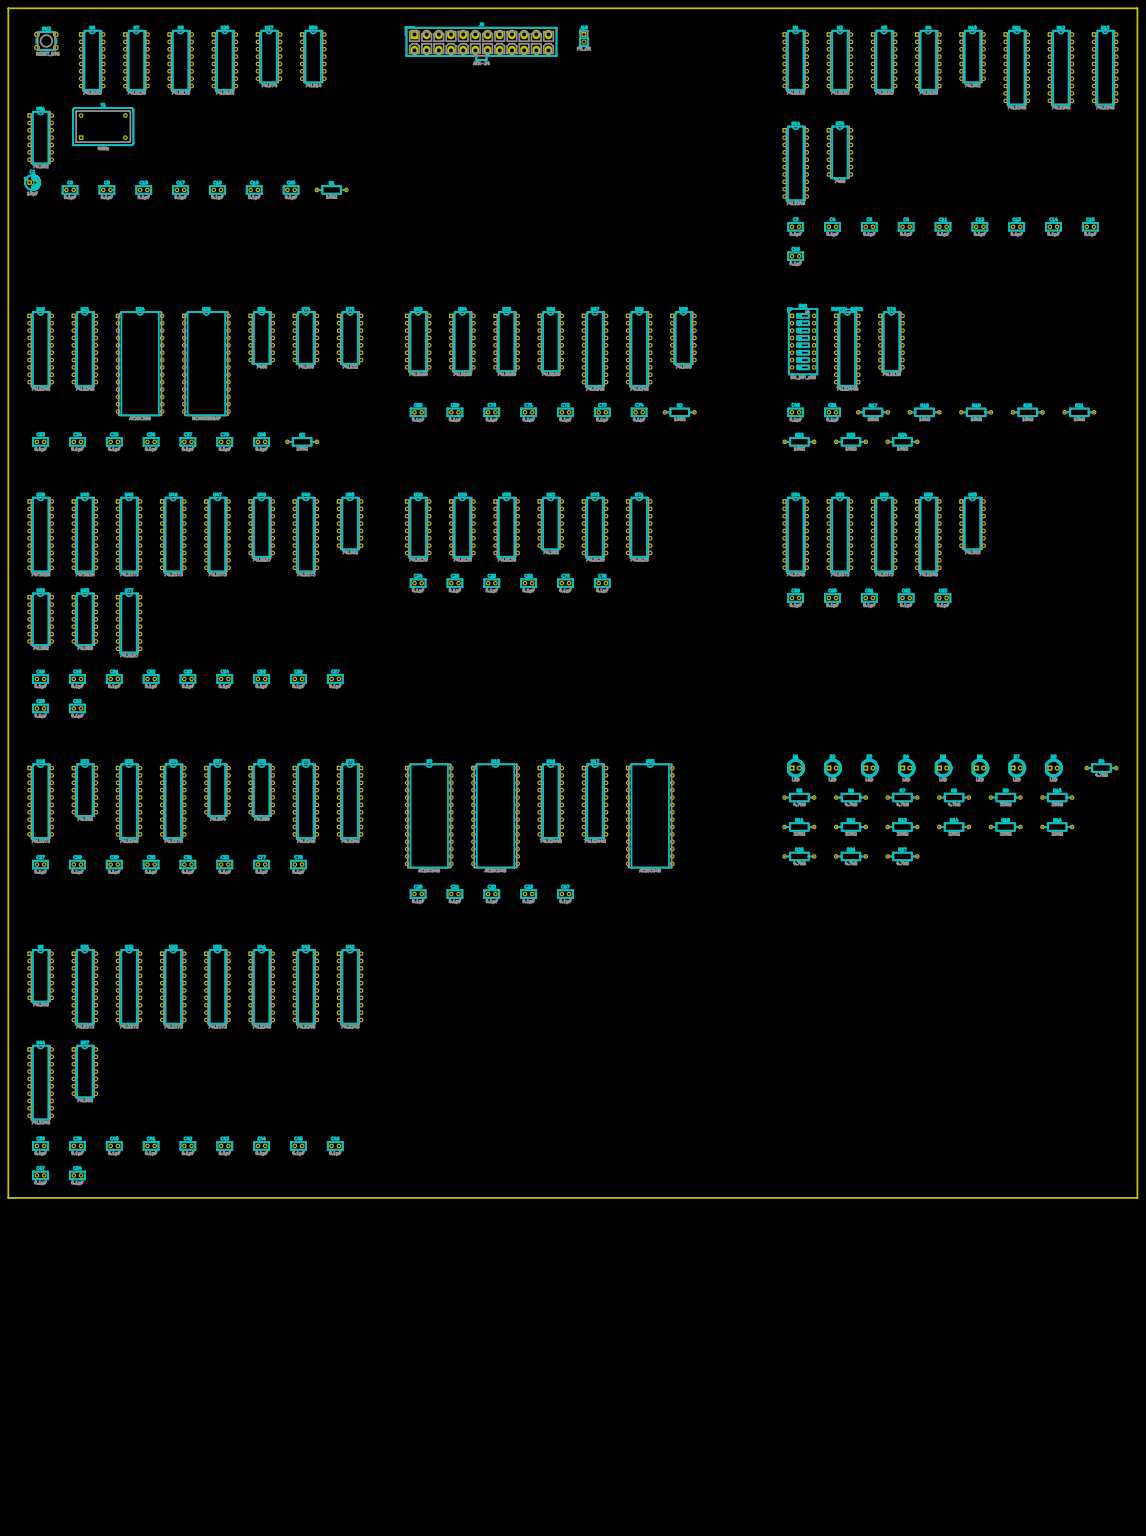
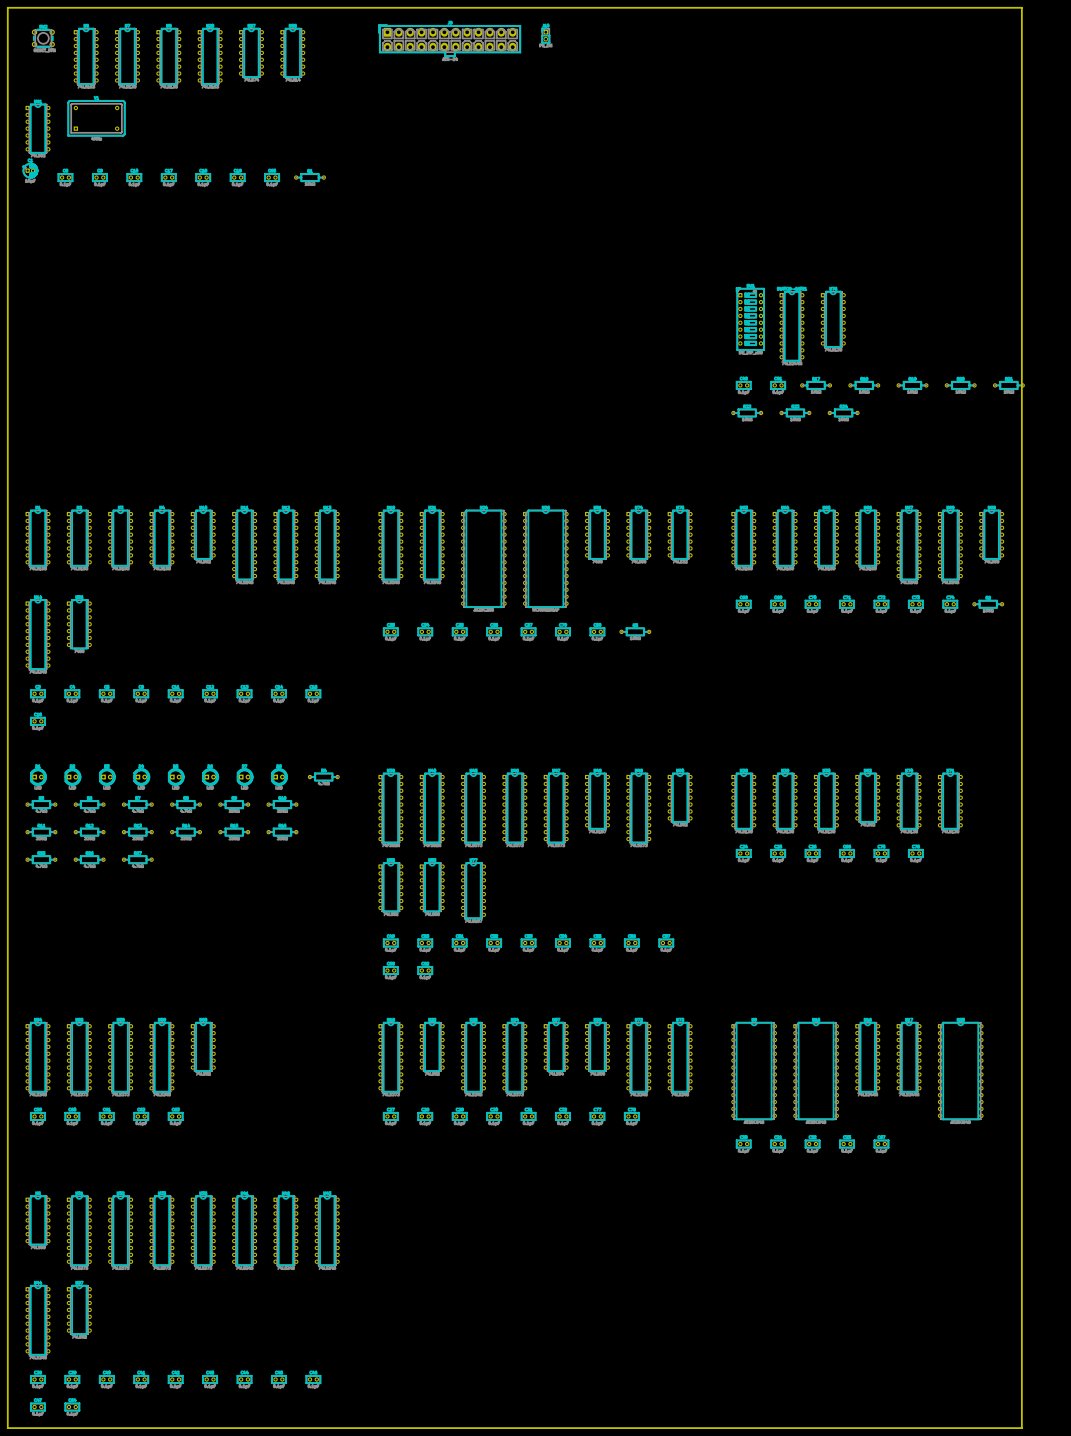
board edge: (1093, 8) (1137, 8) (1137, 1197) (8, 1197) -> (1021, 7) (1021, 1428) (7, 1428) (7, 1119)
part position: (972, 56) -> (203, 534)
part position: (795, 60) -> (37, 538)
part position: (839, 60) -> (79, 538)
part position: (884, 60) -> (120, 538)
part position: (928, 60) -> (161, 538)
part position: (1016, 67) -> (244, 545)
part position: (1060, 67) -> (285, 545)
part position: (1105, 67) -> (327, 545)
part position: (839, 152) -> (79, 624)
part position: (795, 163) -> (37, 634)
part position: (795, 226) -> (37, 693)
part position: (832, 226) -> (72, 693)
part position: (869, 226) -> (106, 693)
part position: (906, 226) -> (141, 693)
part position: (942, 226) -> (175, 693)
part position: (979, 226) -> (210, 693)
part position: (1016, 226) -> (244, 693)
part position: (1053, 226) -> (278, 693)
part position: (1090, 226) -> (313, 693)
part position: (795, 256) -> (37, 721)
part position: (261, 337) -> (597, 534)
part position: (305, 337) -> (638, 534)
part position: (350, 337) -> (680, 534)
part position: (683, 337) -> (991, 534)
part position: (418, 341) -> (743, 538)
part position: (462, 341) -> (785, 538)
part position: (506, 341) -> (826, 538)
part position: (550, 341) -> (867, 538)
part position: (40, 348) -> (390, 545)
part position: (84, 348) -> (432, 545)
part position: (594, 348) -> (909, 545)
part position: (639, 348) -> (950, 545)
part position: (140, 363) -> (483, 558)
part position: (206, 363) -> (545, 558)
part position: (418, 412) -> (743, 604)
part position: (454, 412) -> (778, 604)
part position: (491, 412) -> (812, 604)
part position: (528, 412) -> (847, 604)
part position: (565, 412) -> (881, 604)
part position: (602, 412) -> (915, 604)
part position: (639, 412) -> (950, 604)
part position: (679, 412) -> (988, 604)
part position: (40, 441) -> (390, 631)
part position: (77, 441) -> (425, 631)
part position: (114, 441) -> (459, 631)
part position: (151, 441) -> (494, 631)
part position: (187, 441) -> (528, 631)
part position: (224, 441) -> (562, 631)
part position: (261, 441) -> (597, 631)
part position: (302, 441) -> (635, 631)
part position: (350, 523) -> (680, 797)
part position: (550, 523) -> (867, 797)
part position: (972, 523) -> (203, 1046)
part position: (261, 527) -> (597, 801)
part position: (418, 527) -> (743, 801)
part position: (462, 527) -> (785, 801)
part position: (506, 527) -> (826, 801)
part position: (594, 527) -> (909, 801)
part position: (639, 527) -> (950, 801)
part position: (40, 534) -> (390, 808)
part position: (84, 534) -> (432, 808)
part position: (129, 534) -> (473, 808)
part position: (173, 534) -> (514, 808)
part position: (217, 534) -> (556, 808)
part position: (305, 534) -> (638, 808)
part position: (795, 534) -> (37, 1057)
part position: (839, 534) -> (79, 1057)
part position: (884, 534) -> (120, 1057)
part position: (928, 534) -> (161, 1057)
part position: (418, 583) -> (743, 853)
part position: (454, 583) -> (778, 853)
part position: (491, 583) -> (812, 853)
part position: (528, 583) -> (847, 853)
part position: (565, 583) -> (881, 853)
part position: (602, 583) -> (915, 853)
part position: (795, 597) -> (37, 1116)
part position: (832, 597) -> (72, 1116)
part position: (869, 597) -> (106, 1116)
part position: (906, 597) -> (141, 1116)
part position: (942, 597) -> (175, 1116)
part position: (40, 619) -> (390, 887)
part position: (84, 619) -> (432, 887)
part position: (129, 623) -> (473, 890)
part position: (40, 678) -> (390, 943)
part position: (77, 678) -> (425, 943)
part position: (114, 678) -> (459, 943)
part position: (151, 678) -> (494, 943)
part position: (187, 678) -> (528, 943)
part position: (224, 678) -> (562, 943)
part position: (261, 678) -> (597, 943)
part position: (298, 678) -> (631, 943)
part position: (335, 678) -> (666, 943)
part position: (40, 708) -> (390, 970)
part position: (77, 708) -> (425, 970)
part position: (796, 768) -> (38, 777)
part position: (833, 768) -> (73, 777)
part position: (869, 768) -> (107, 777)
part position: (906, 768) -> (141, 777)
part position: (943, 768) -> (176, 777)
part position: (980, 768) -> (210, 777)
part position: (1017, 768) -> (245, 777)
part position: (1054, 768) -> (279, 777)
part position: (1101, 768) -> (323, 777)
part position: (84, 790) -> (432, 1046)
part position: (217, 790) -> (556, 1046)
part position: (261, 790) -> (597, 1046)
part position: (799, 797) -> (41, 804)
part position: (850, 797) -> (89, 804)
part position: (902, 797) -> (137, 804)
part position: (954, 797) -> (186, 804)
part position: (1005, 797) -> (234, 804)
part position: (1057, 797) -> (282, 804)
part position: (40, 801) -> (390, 1057)
part position: (129, 801) -> (473, 1057)
part position: (173, 801) -> (514, 1057)
part position: (305, 801) -> (638, 1057)
part position: (350, 801) -> (680, 1057)
part position: (550, 801) -> (867, 1057)
part position: (594, 801) -> (909, 1057)
part position: (429, 815) -> (754, 1071)
part position: (495, 815) -> (816, 1071)
part position: (650, 815) -> (960, 1071)
part position: (799, 826) -> (41, 832)
part position: (850, 826) -> (89, 832)
part position: (902, 826) -> (137, 832)
part position: (954, 826) -> (186, 832)
part position: (1005, 826) -> (234, 832)
part position: (1057, 826) -> (282, 832)
part position: (799, 856) -> (41, 859)
part position: (850, 856) -> (89, 859)
part position: (902, 856) -> (137, 859)
part position: (40, 864) -> (390, 1116)
part position: (77, 864) -> (425, 1116)
part position: (114, 864) -> (459, 1116)
part position: (151, 864) -> (494, 1116)
part position: (187, 864) -> (528, 1116)
part position: (224, 864) -> (562, 1116)
part position: (261, 864) -> (597, 1116)
part position: (298, 864) -> (631, 1116)
part position: (418, 894) -> (743, 1144)
part position: (454, 894) -> (778, 1144)
part position: (491, 894) -> (812, 1144)
part position: (528, 894) -> (847, 1144)
part position: (565, 894) -> (881, 1144)
part position: (40, 975) -> (37, 1220)
part position: (84, 986) -> (79, 1230)
part position: (129, 986) -> (120, 1230)
part position: (173, 986) -> (161, 1230)
part position: (217, 986) -> (203, 1230)
part position: (261, 986) -> (244, 1230)
part position: (305, 986) -> (285, 1230)
part position: (350, 986) -> (327, 1230)
part position: (84, 1071) -> (79, 1309)
part position: (40, 1082) -> (37, 1320)
part position: (40, 1145) -> (37, 1379)
part position: (77, 1145) -> (72, 1379)
part position: (114, 1145) -> (106, 1379)
part position: (151, 1145) -> (141, 1379)
part position: (187, 1145) -> (175, 1379)
part position: (224, 1145) -> (210, 1379)
part position: (261, 1145) -> (244, 1379)
part position: (298, 1145) -> (278, 1379)
part position: (335, 1145) -> (313, 1379)
part position: (40, 1175) -> (37, 1407)
part position: (77, 1175) -> (72, 1407)

